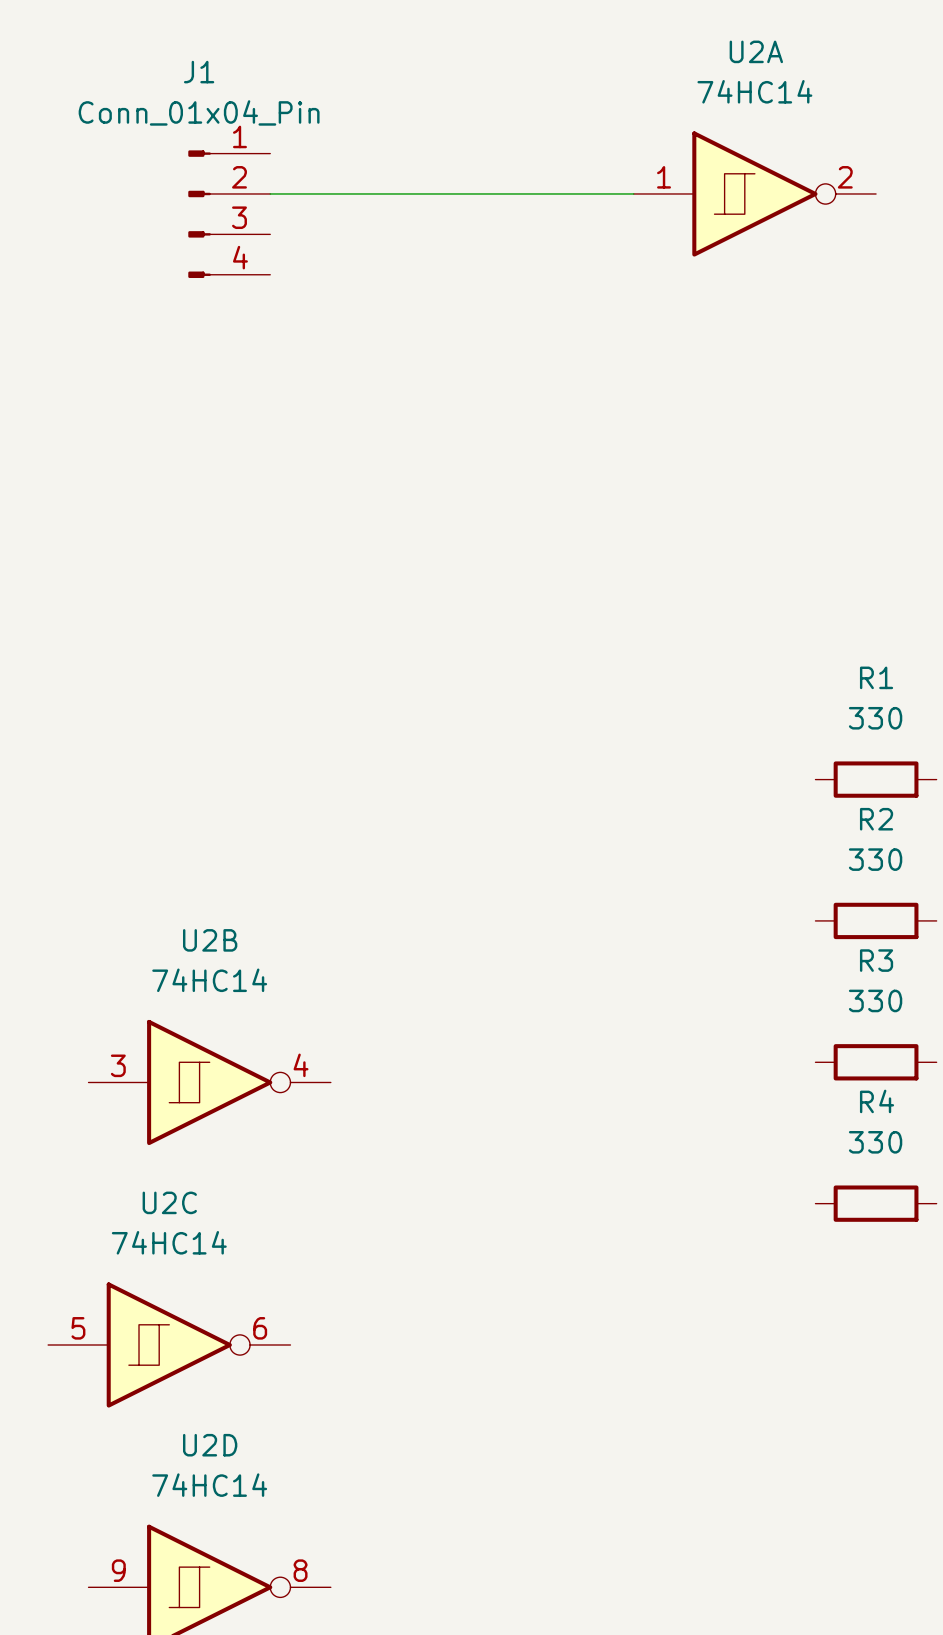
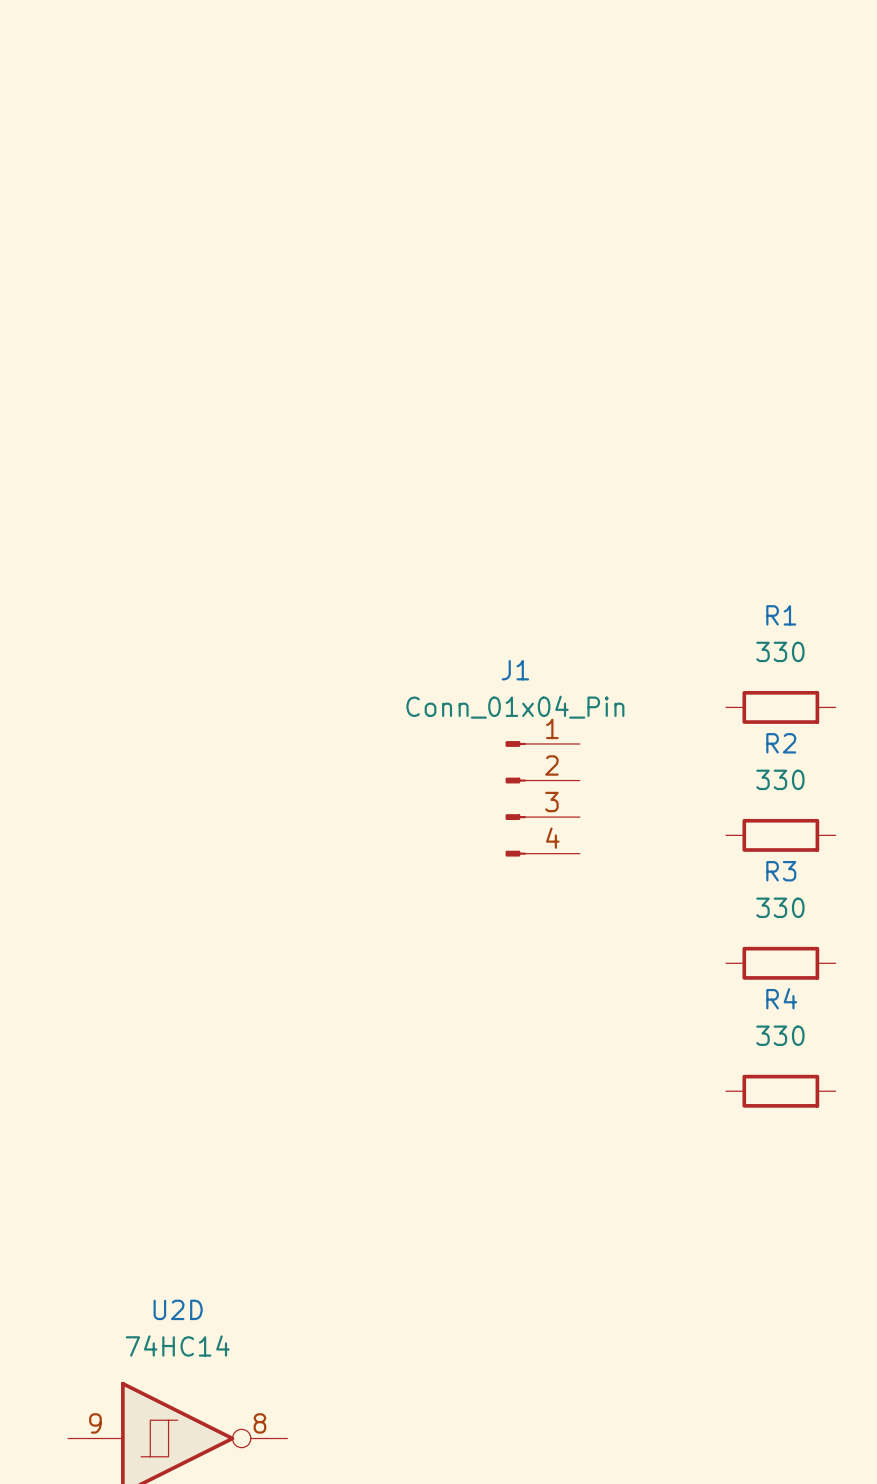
wire: (270, 193) (633, 193) -> none
U2A: 74HC14 (754, 193) -> none
J1 position: (229, 214) -> (542, 798)
U2B: 74HC14 (209, 1082) -> none
U2C: 74HC14 (169, 1344) -> none

